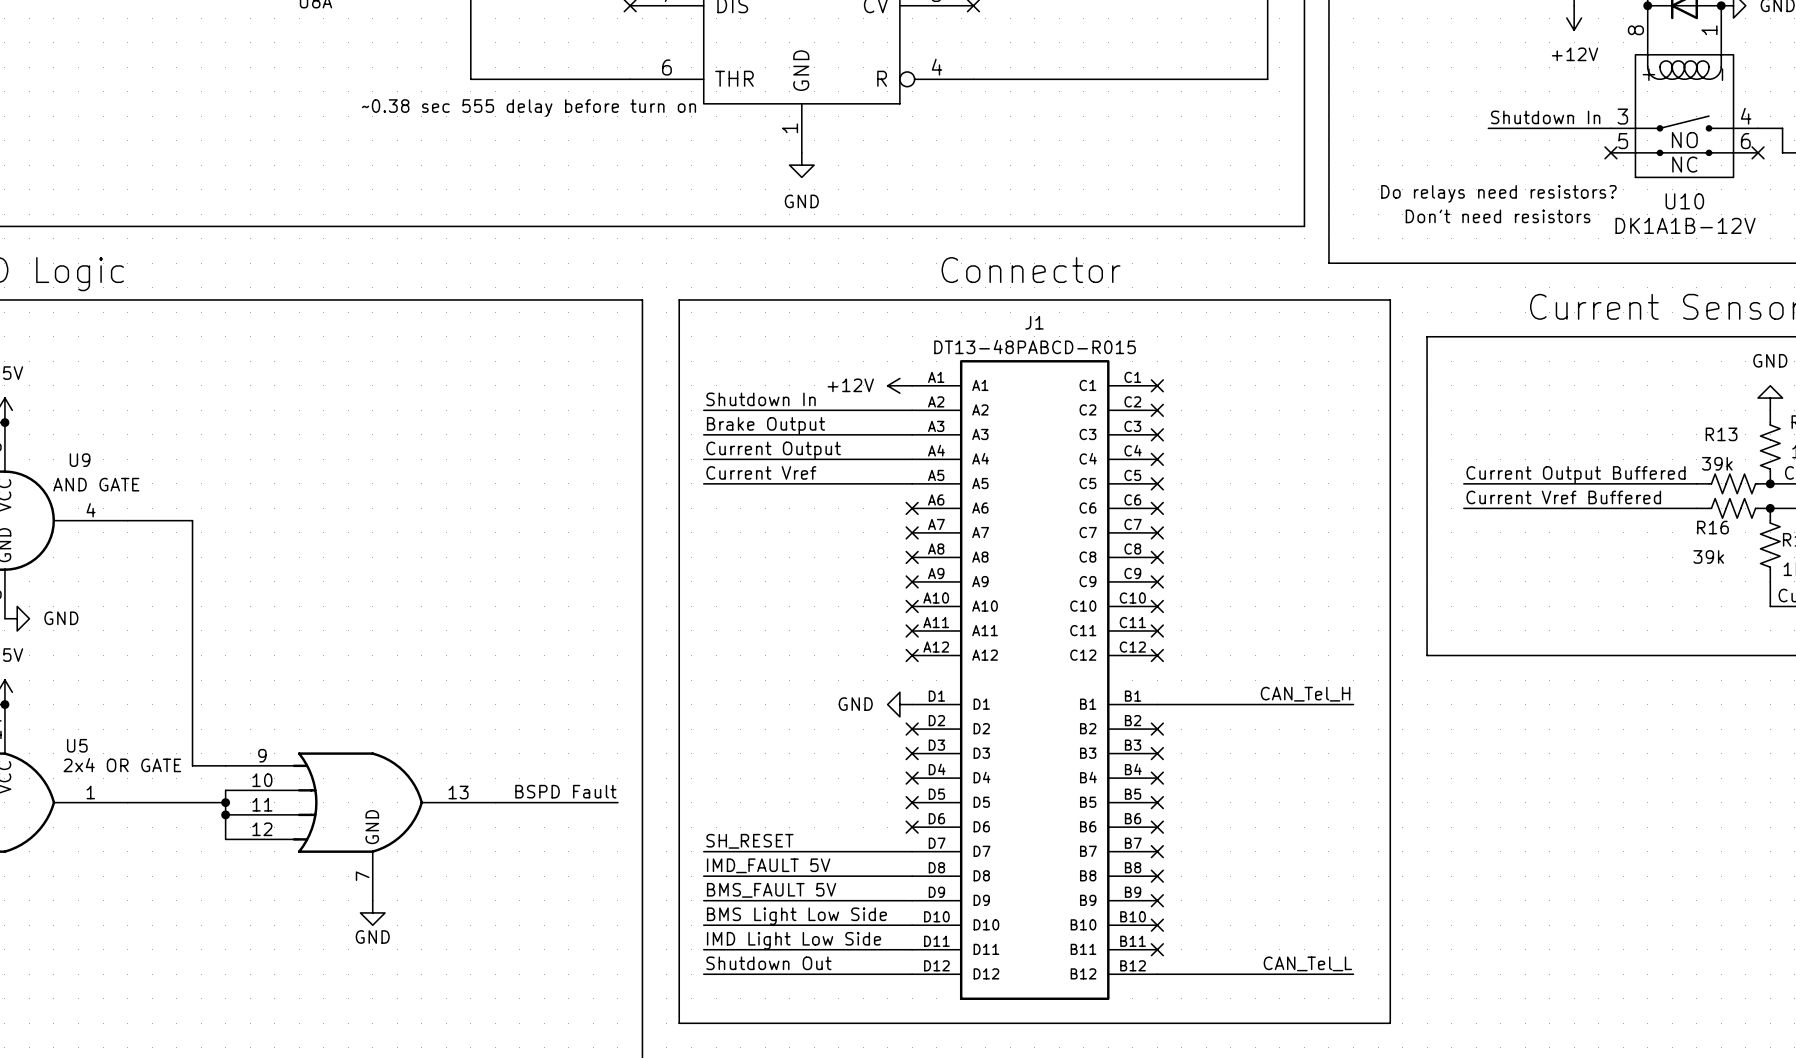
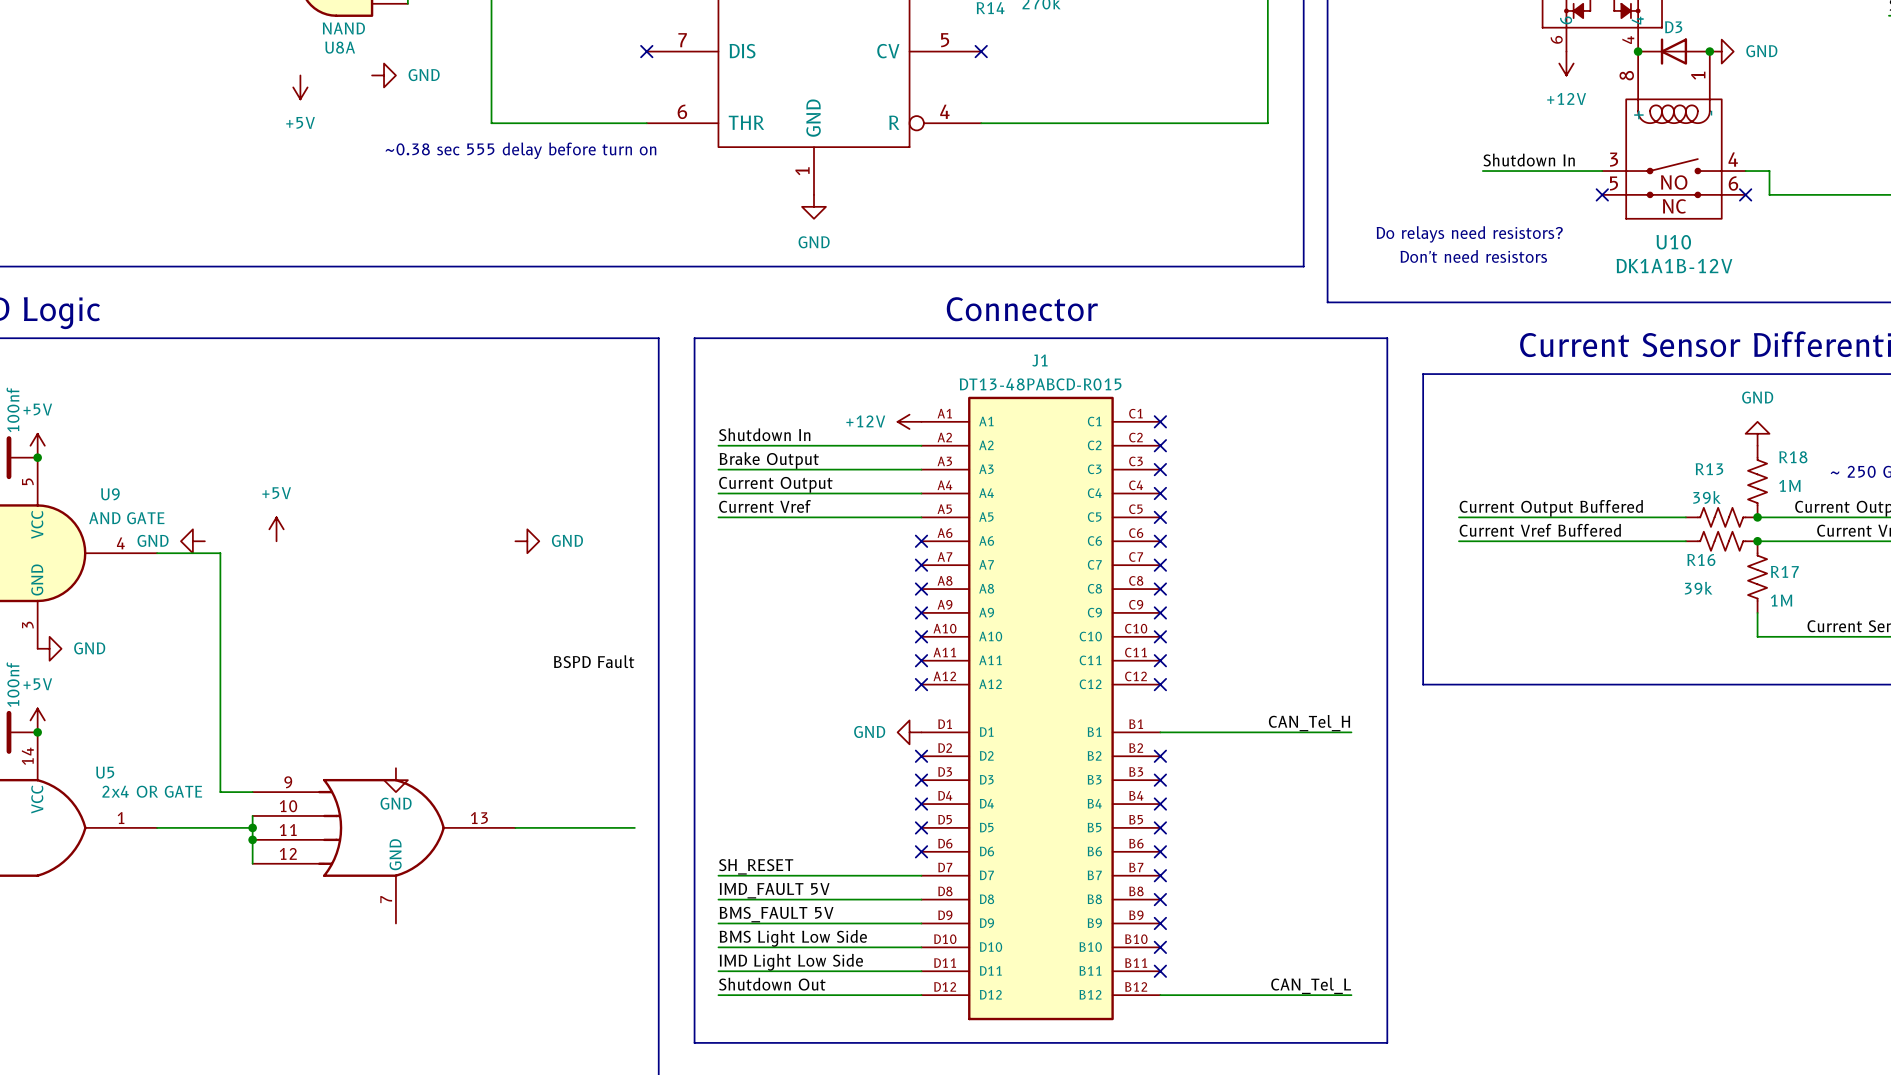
power symbol: none -> GND (384, 75)
power symbol: none -> +5V (300, 87)
power symbol: none -> +5V (276, 529)
power symbol: none -> GND (192, 541)
power symbol: none -> GND (527, 541)
label position: BSPD Fault (565, 791) -> BSPD Fault (594, 661)
power symbol position: GND (372, 912) -> GND (395, 780)

